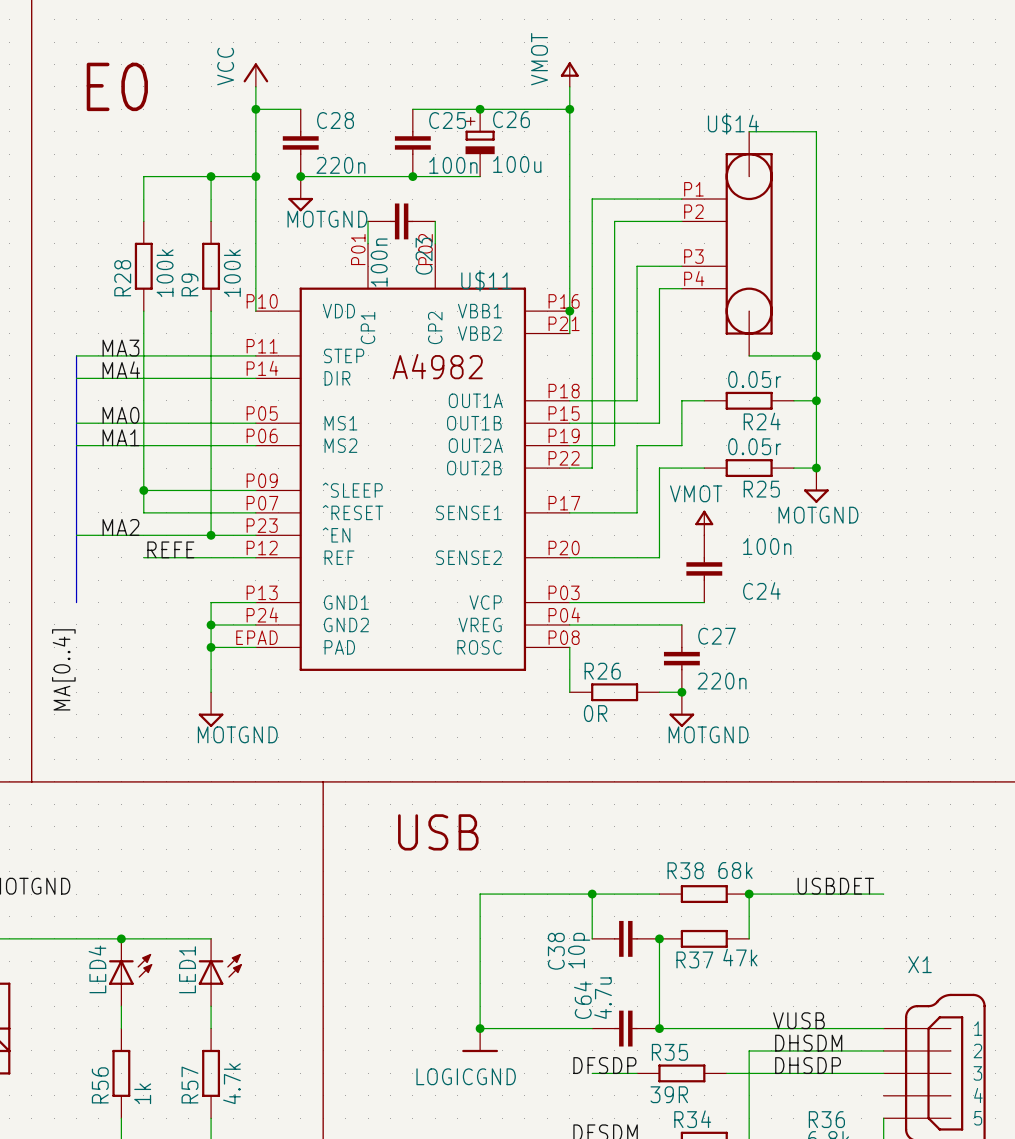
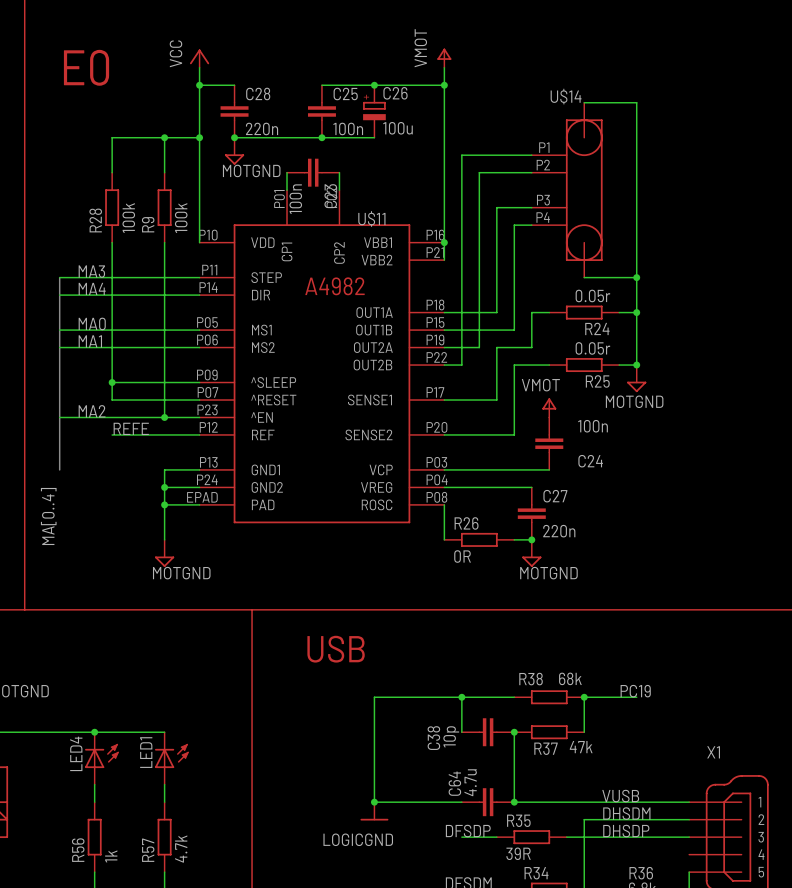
label: USBDET (835, 886) -> PC19 (635, 691)
wire: (816, 894) (883, 894) -> none

